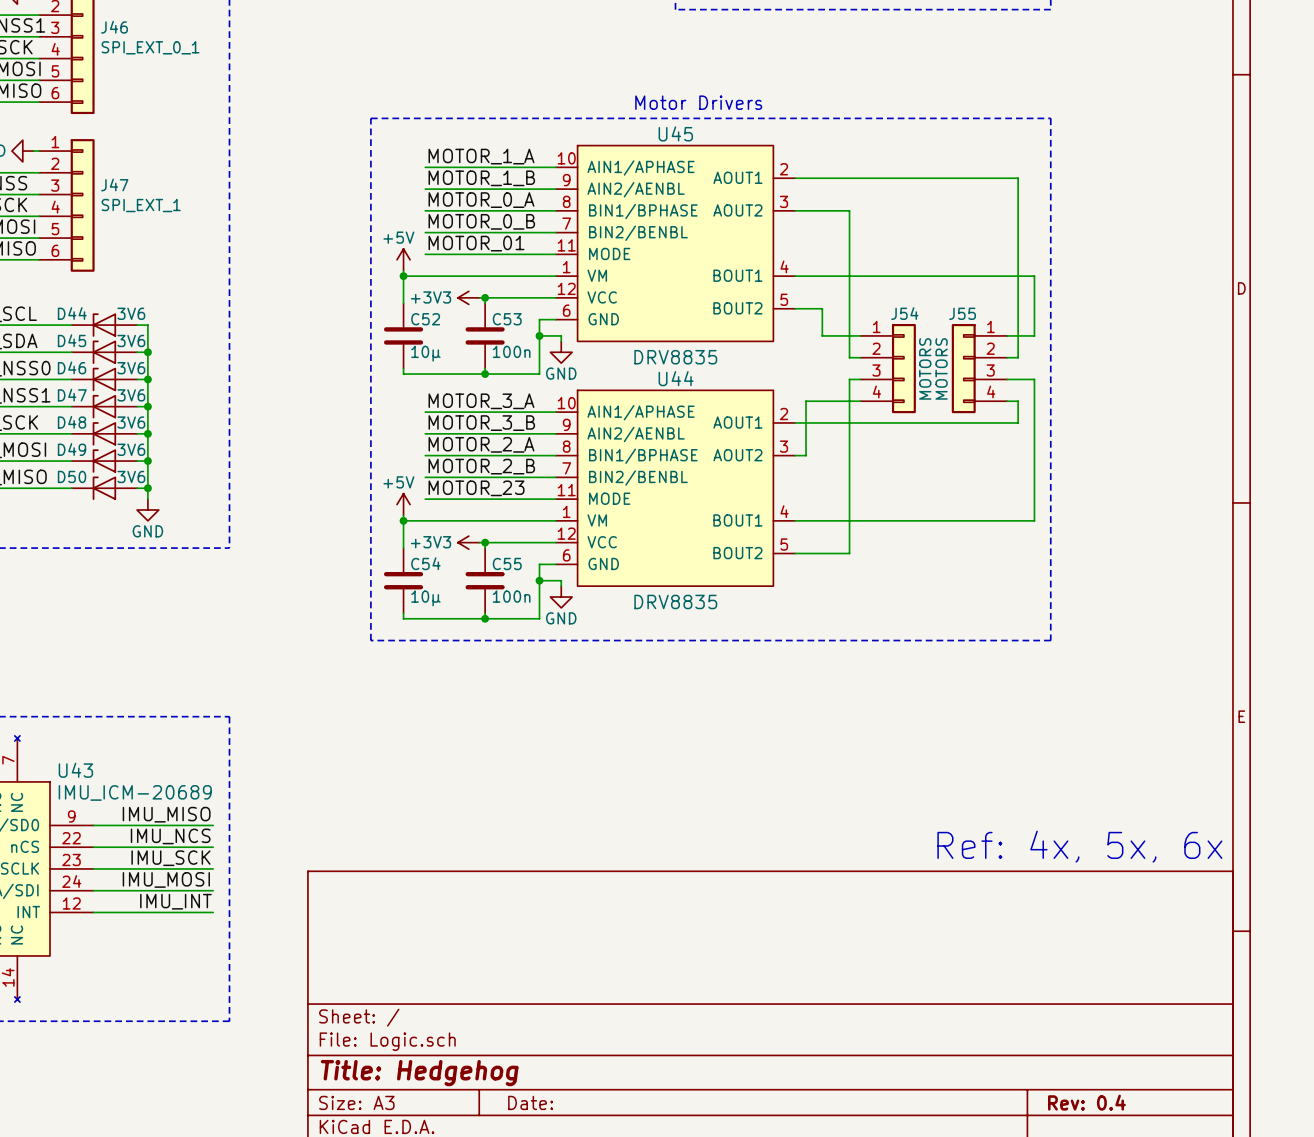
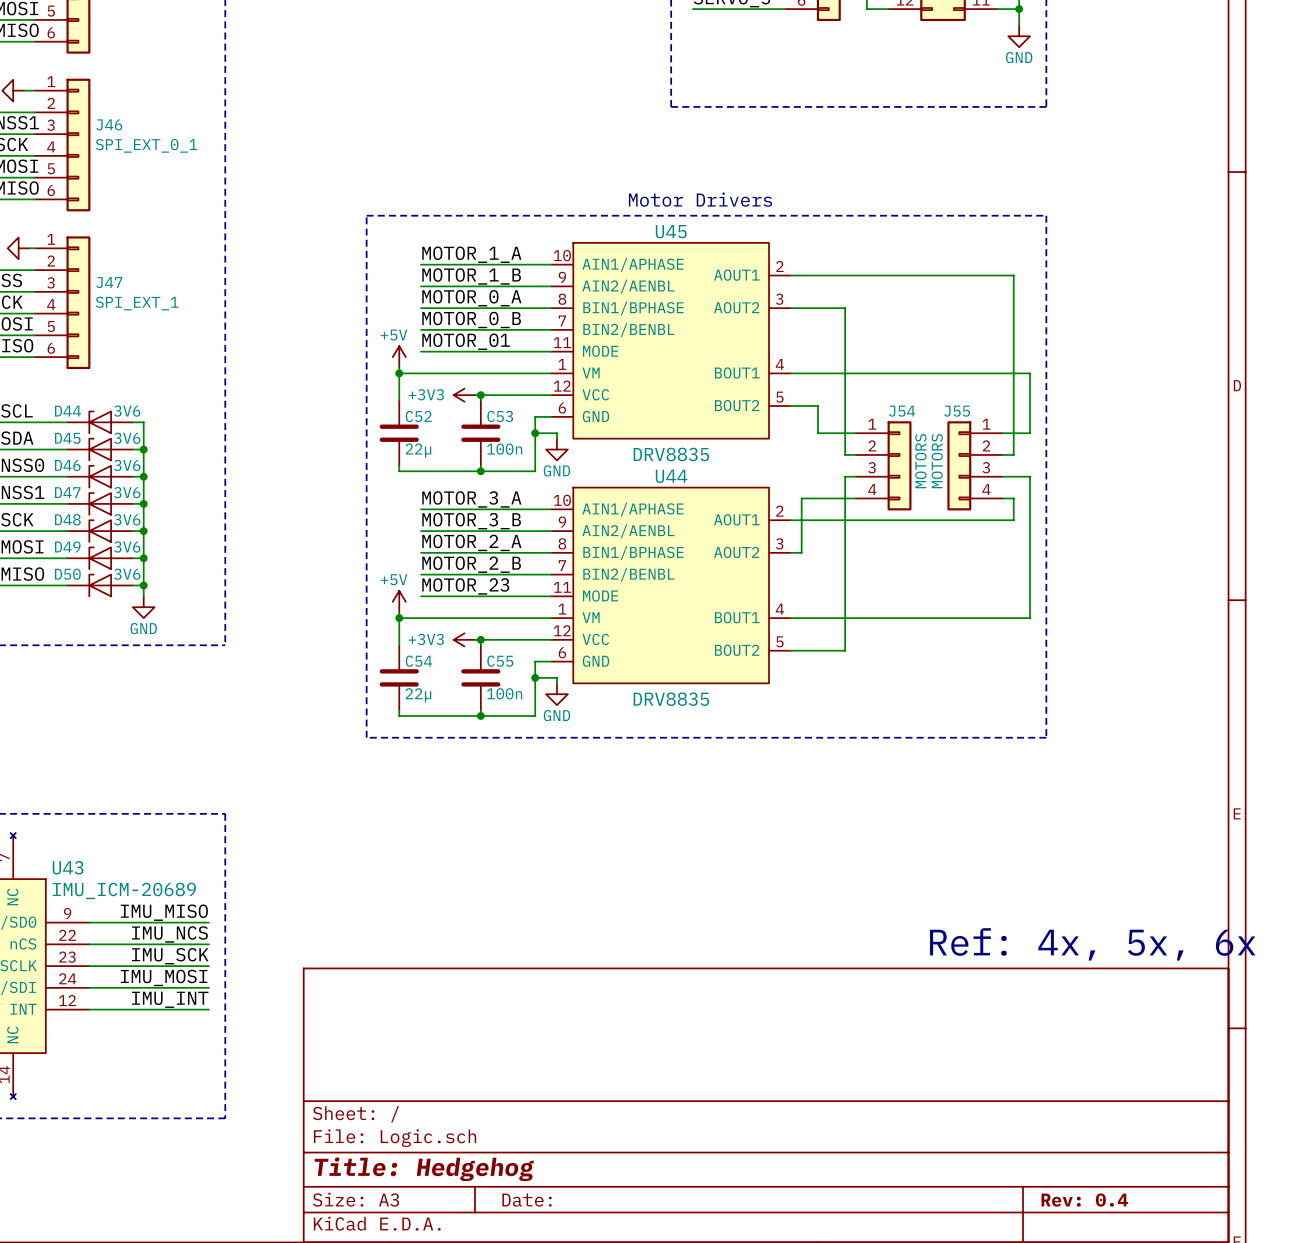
C52 value: 10µ (425, 353) -> 22µ (418, 450)
C54 value: 10µ (425, 598) -> 22µ (418, 695)

